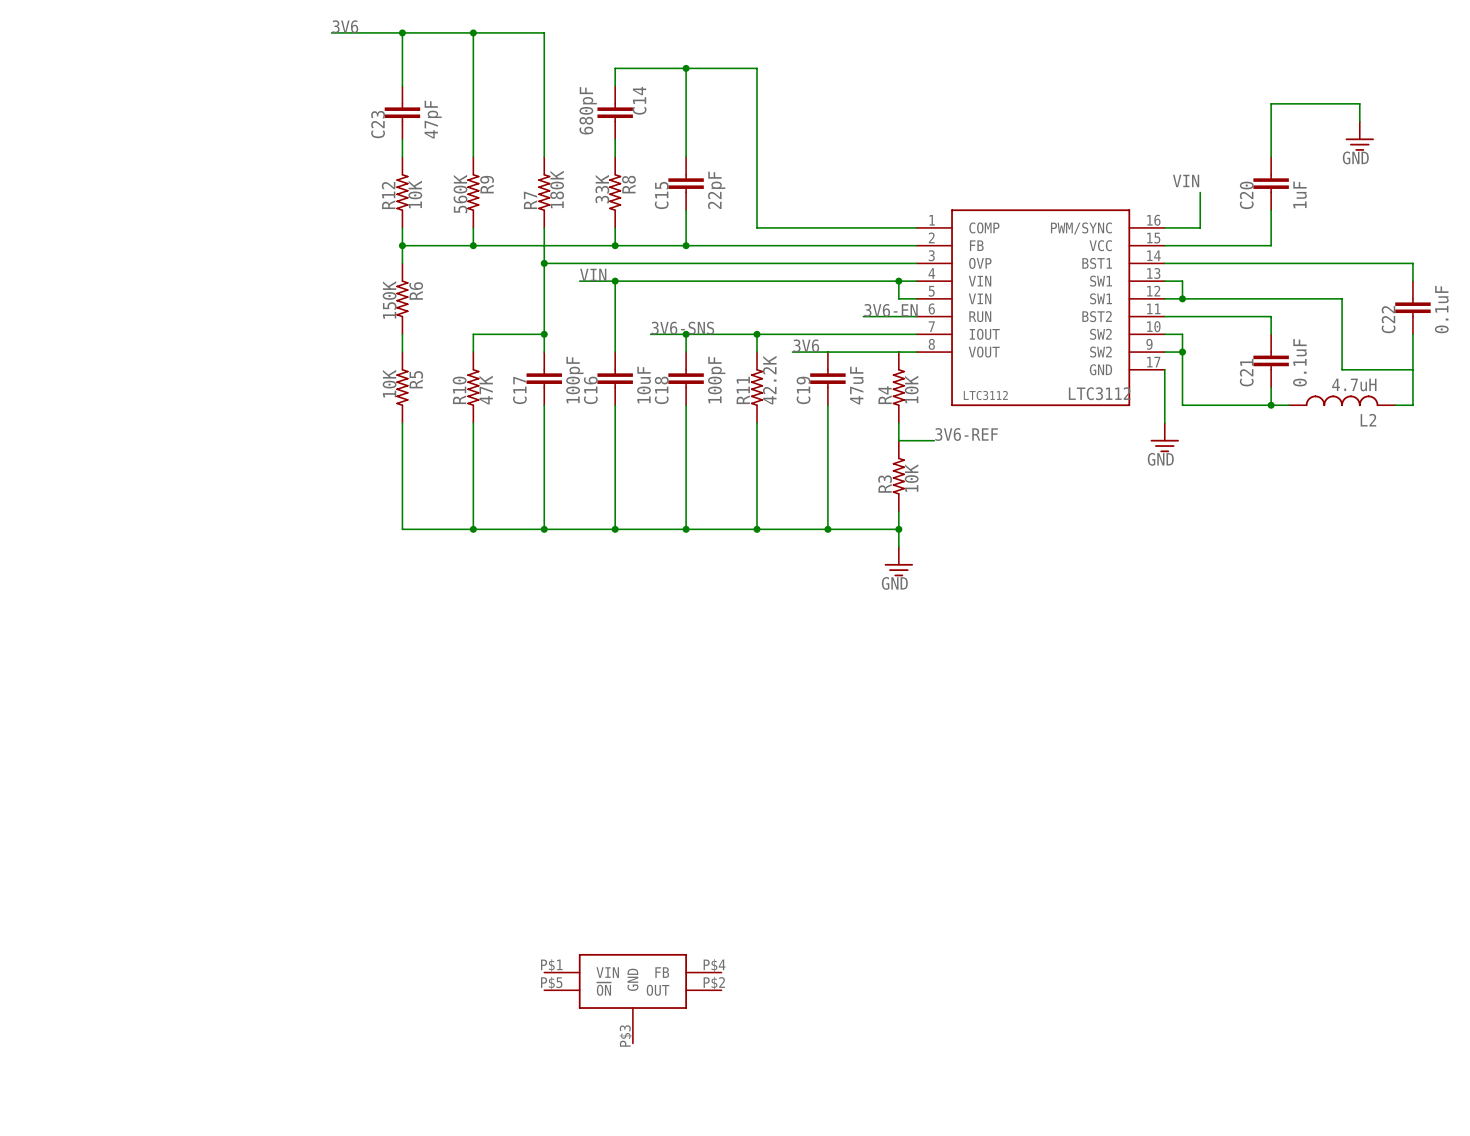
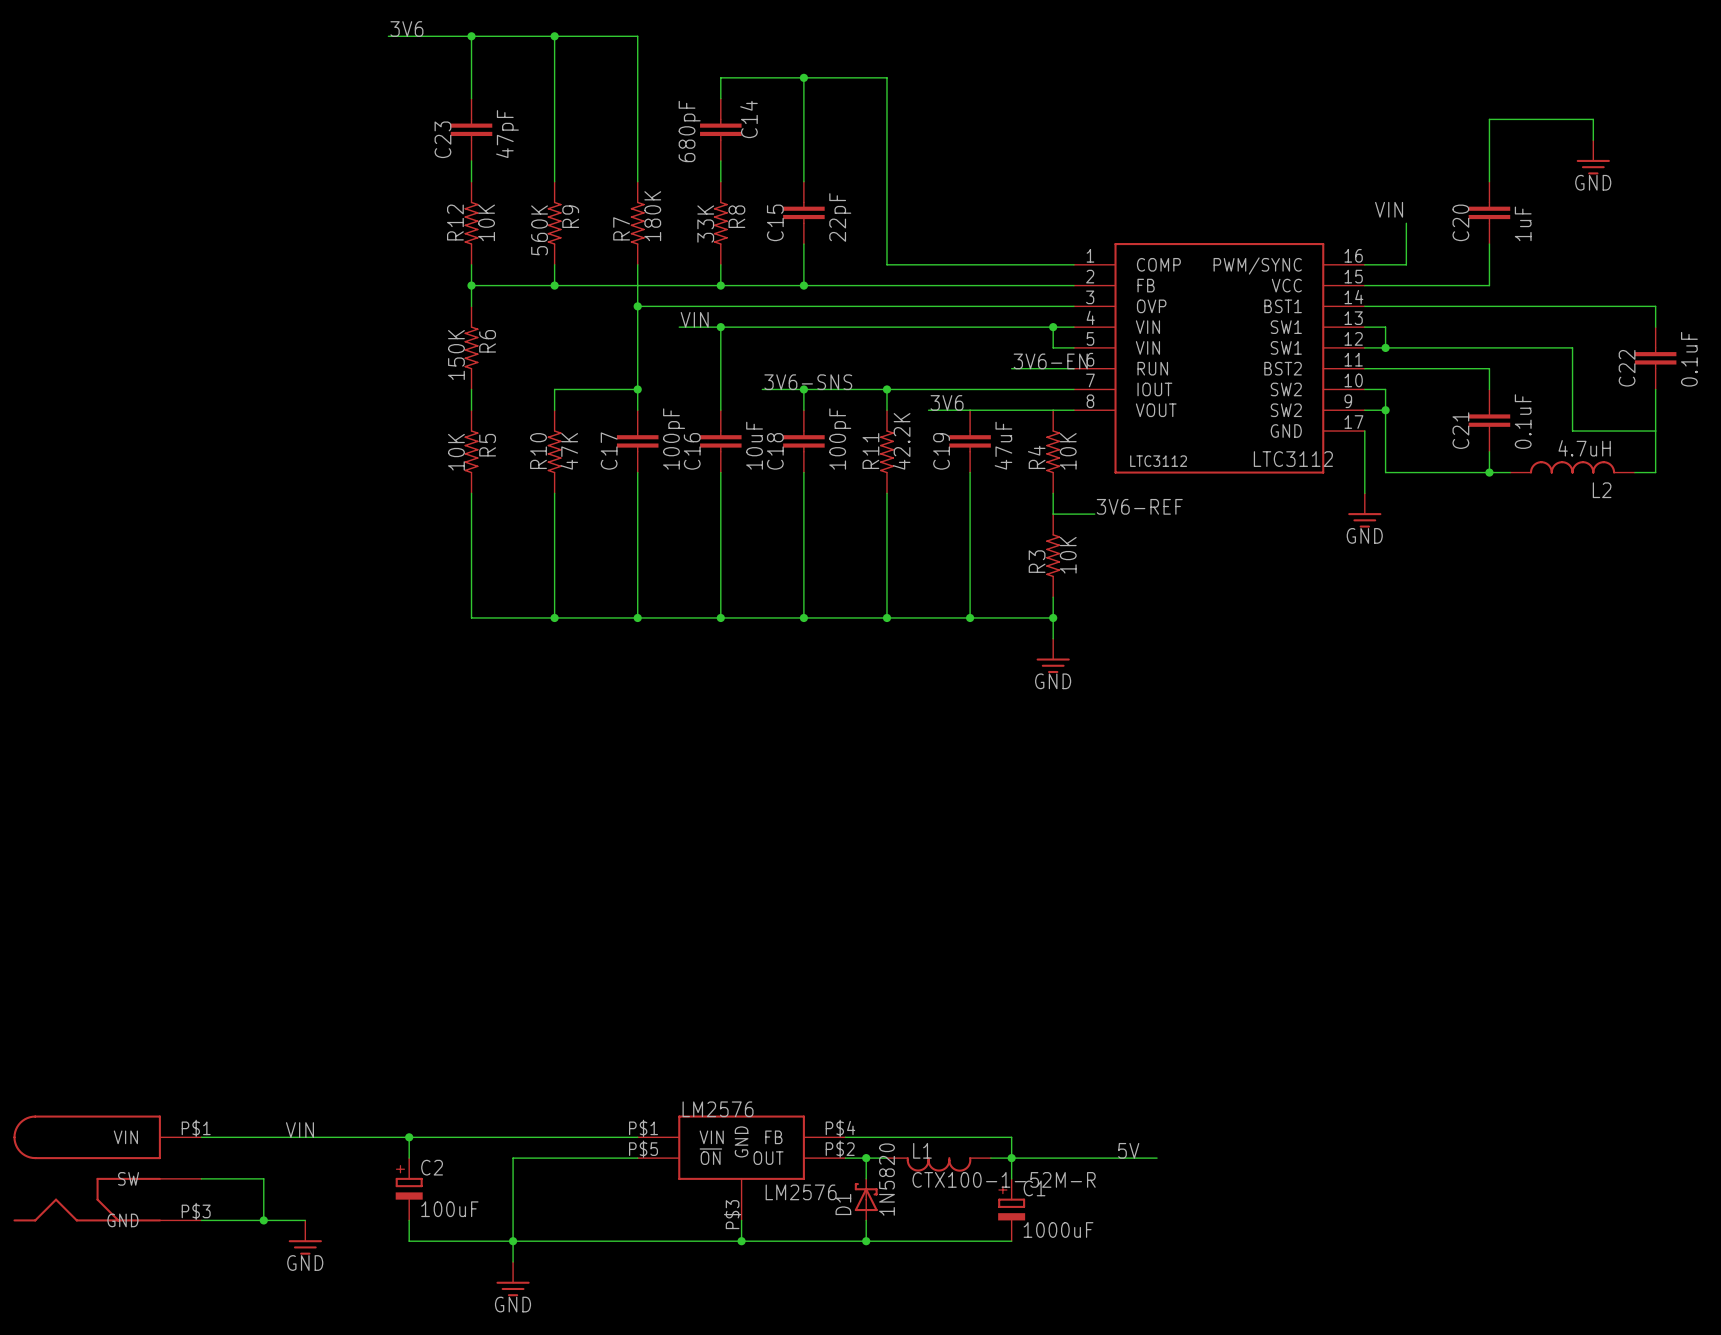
LM2576 name: none -> LM2576 (718, 1109)
label: none -> VIN (299, 1130)
wire: none -> (201, 1137) (637, 1137)
wire: none -> (409, 1137) (409, 1158)
junction: none -> (409, 1137)
wire: none -> (845, 1137) (1011, 1137) (1011, 1178)
label: none -> 5V (1128, 1150)
wire: none -> (637, 1158) (513, 1158) (513, 1261)
wire: none -> (845, 1158) (886, 1158)
wire: none -> (866, 1158) (866, 1178)
junction: none -> (866, 1158)
wire: none -> (990, 1158) (1157, 1158)
junction: none -> (1011, 1158)
L1: none -> CTX100-1-52M-R (938, 1164)
part: none -> (107, 1168)
wire: none -> (201, 1178) (263, 1178) (263, 1220)
C2: none -> 100uF (409, 1189)
LM2576 value: none -> LM2576 (801, 1192)
D1: none -> 1N5820 (866, 1199)
C1: none -> 1000uF (1011, 1210)
wire: none -> (201, 1220) (305, 1220)
junction: none -> (263, 1220)
wire: none -> (409, 1220) (409, 1241) (1011, 1241)
wire: none -> (741, 1220) (741, 1241)
wire: none -> (866, 1220) (866, 1241)
power symbol: none -> GND (305, 1237)
junction: none -> (513, 1241)
junction: none -> (741, 1241)
junction: none -> (866, 1241)
power symbol: none -> GND (513, 1279)

